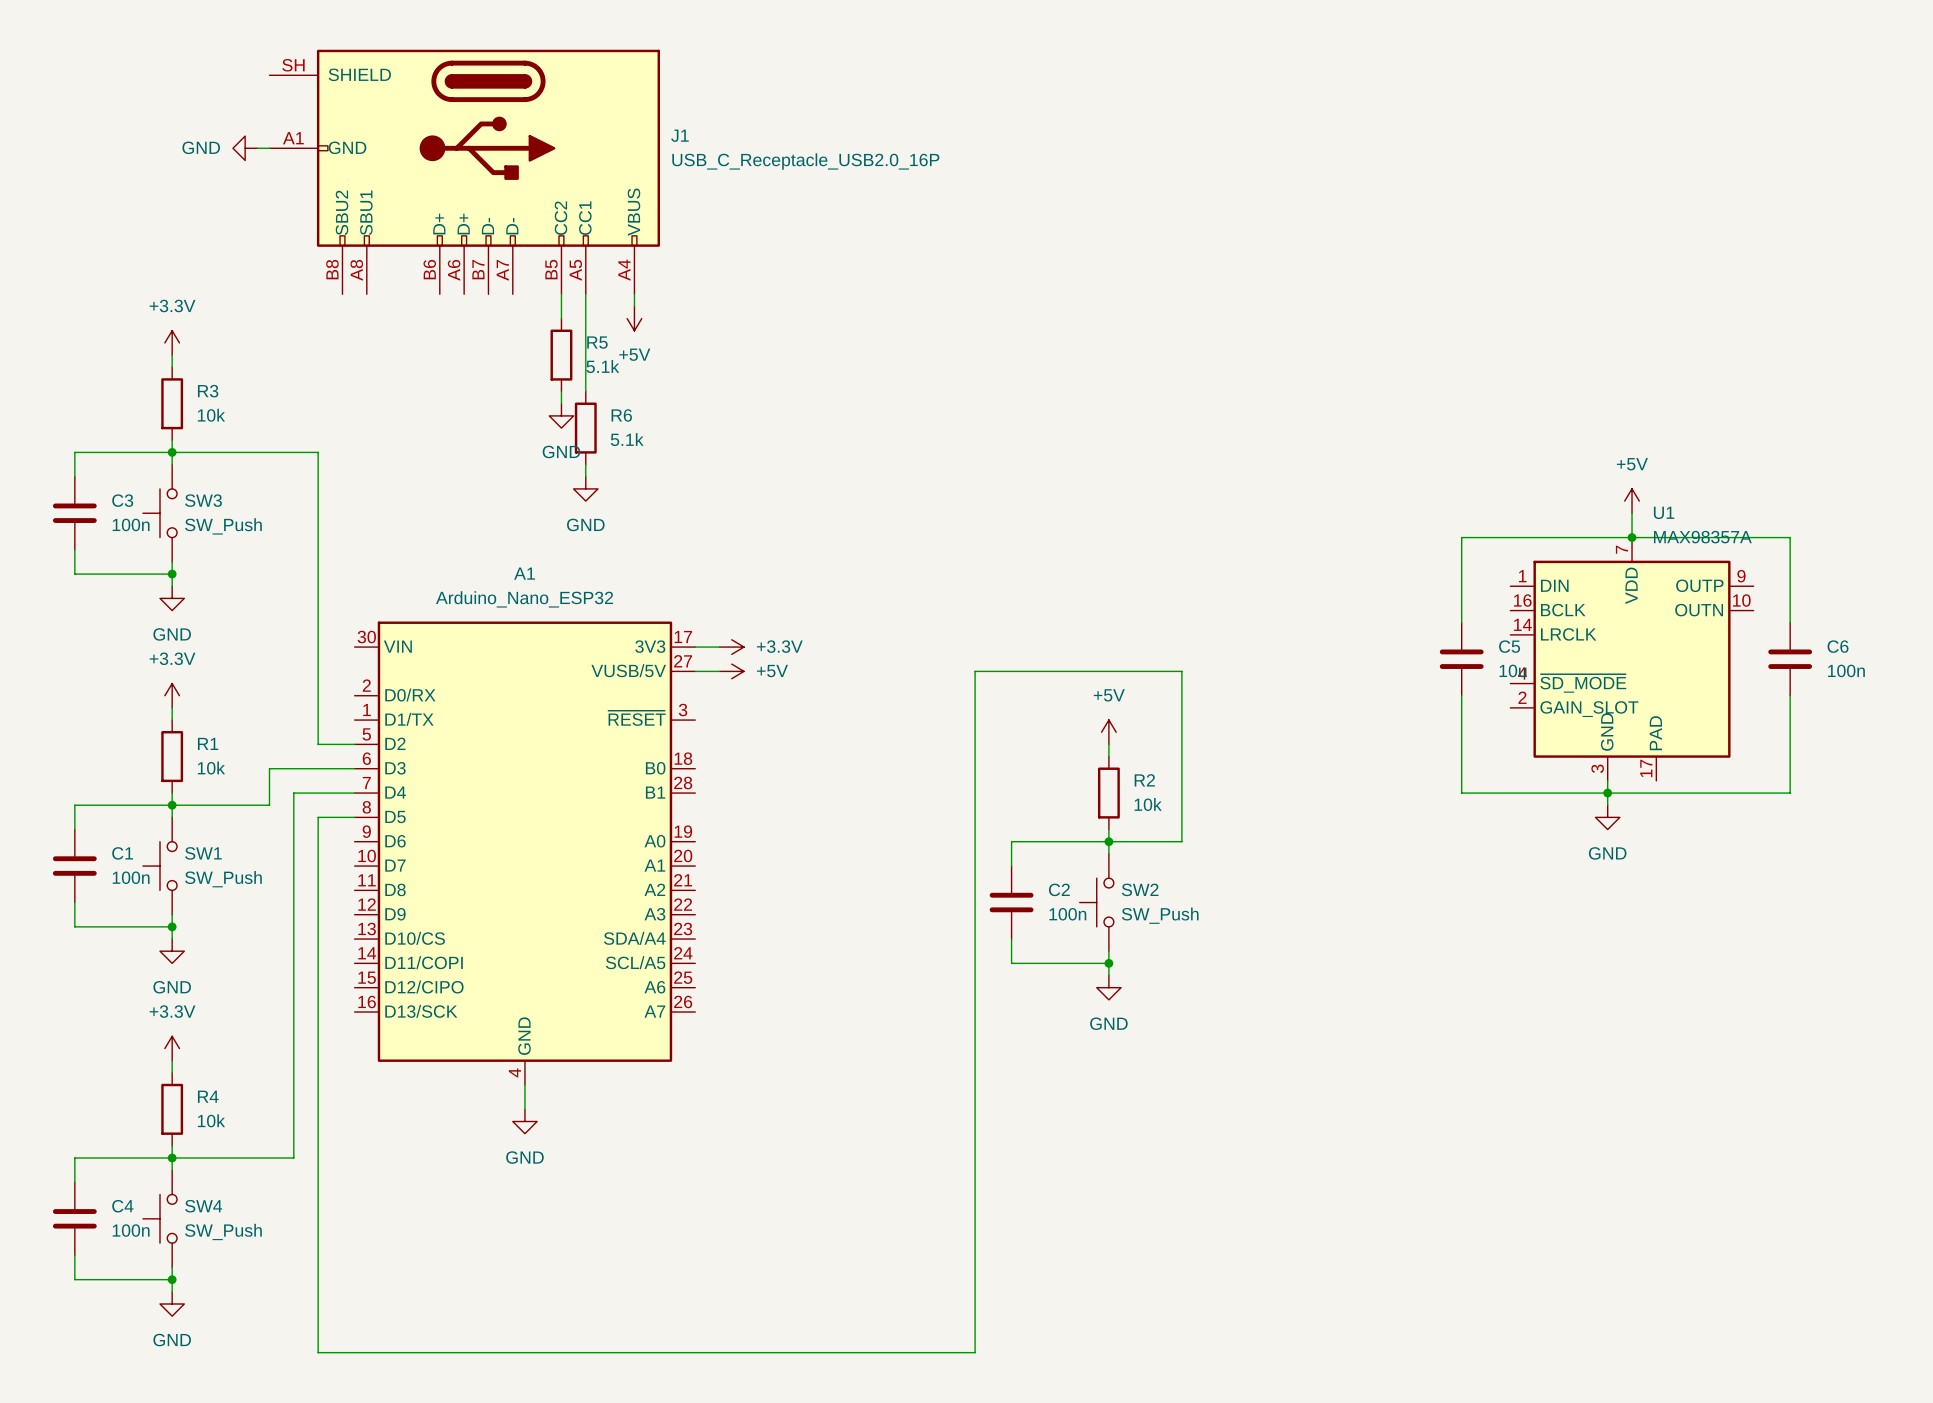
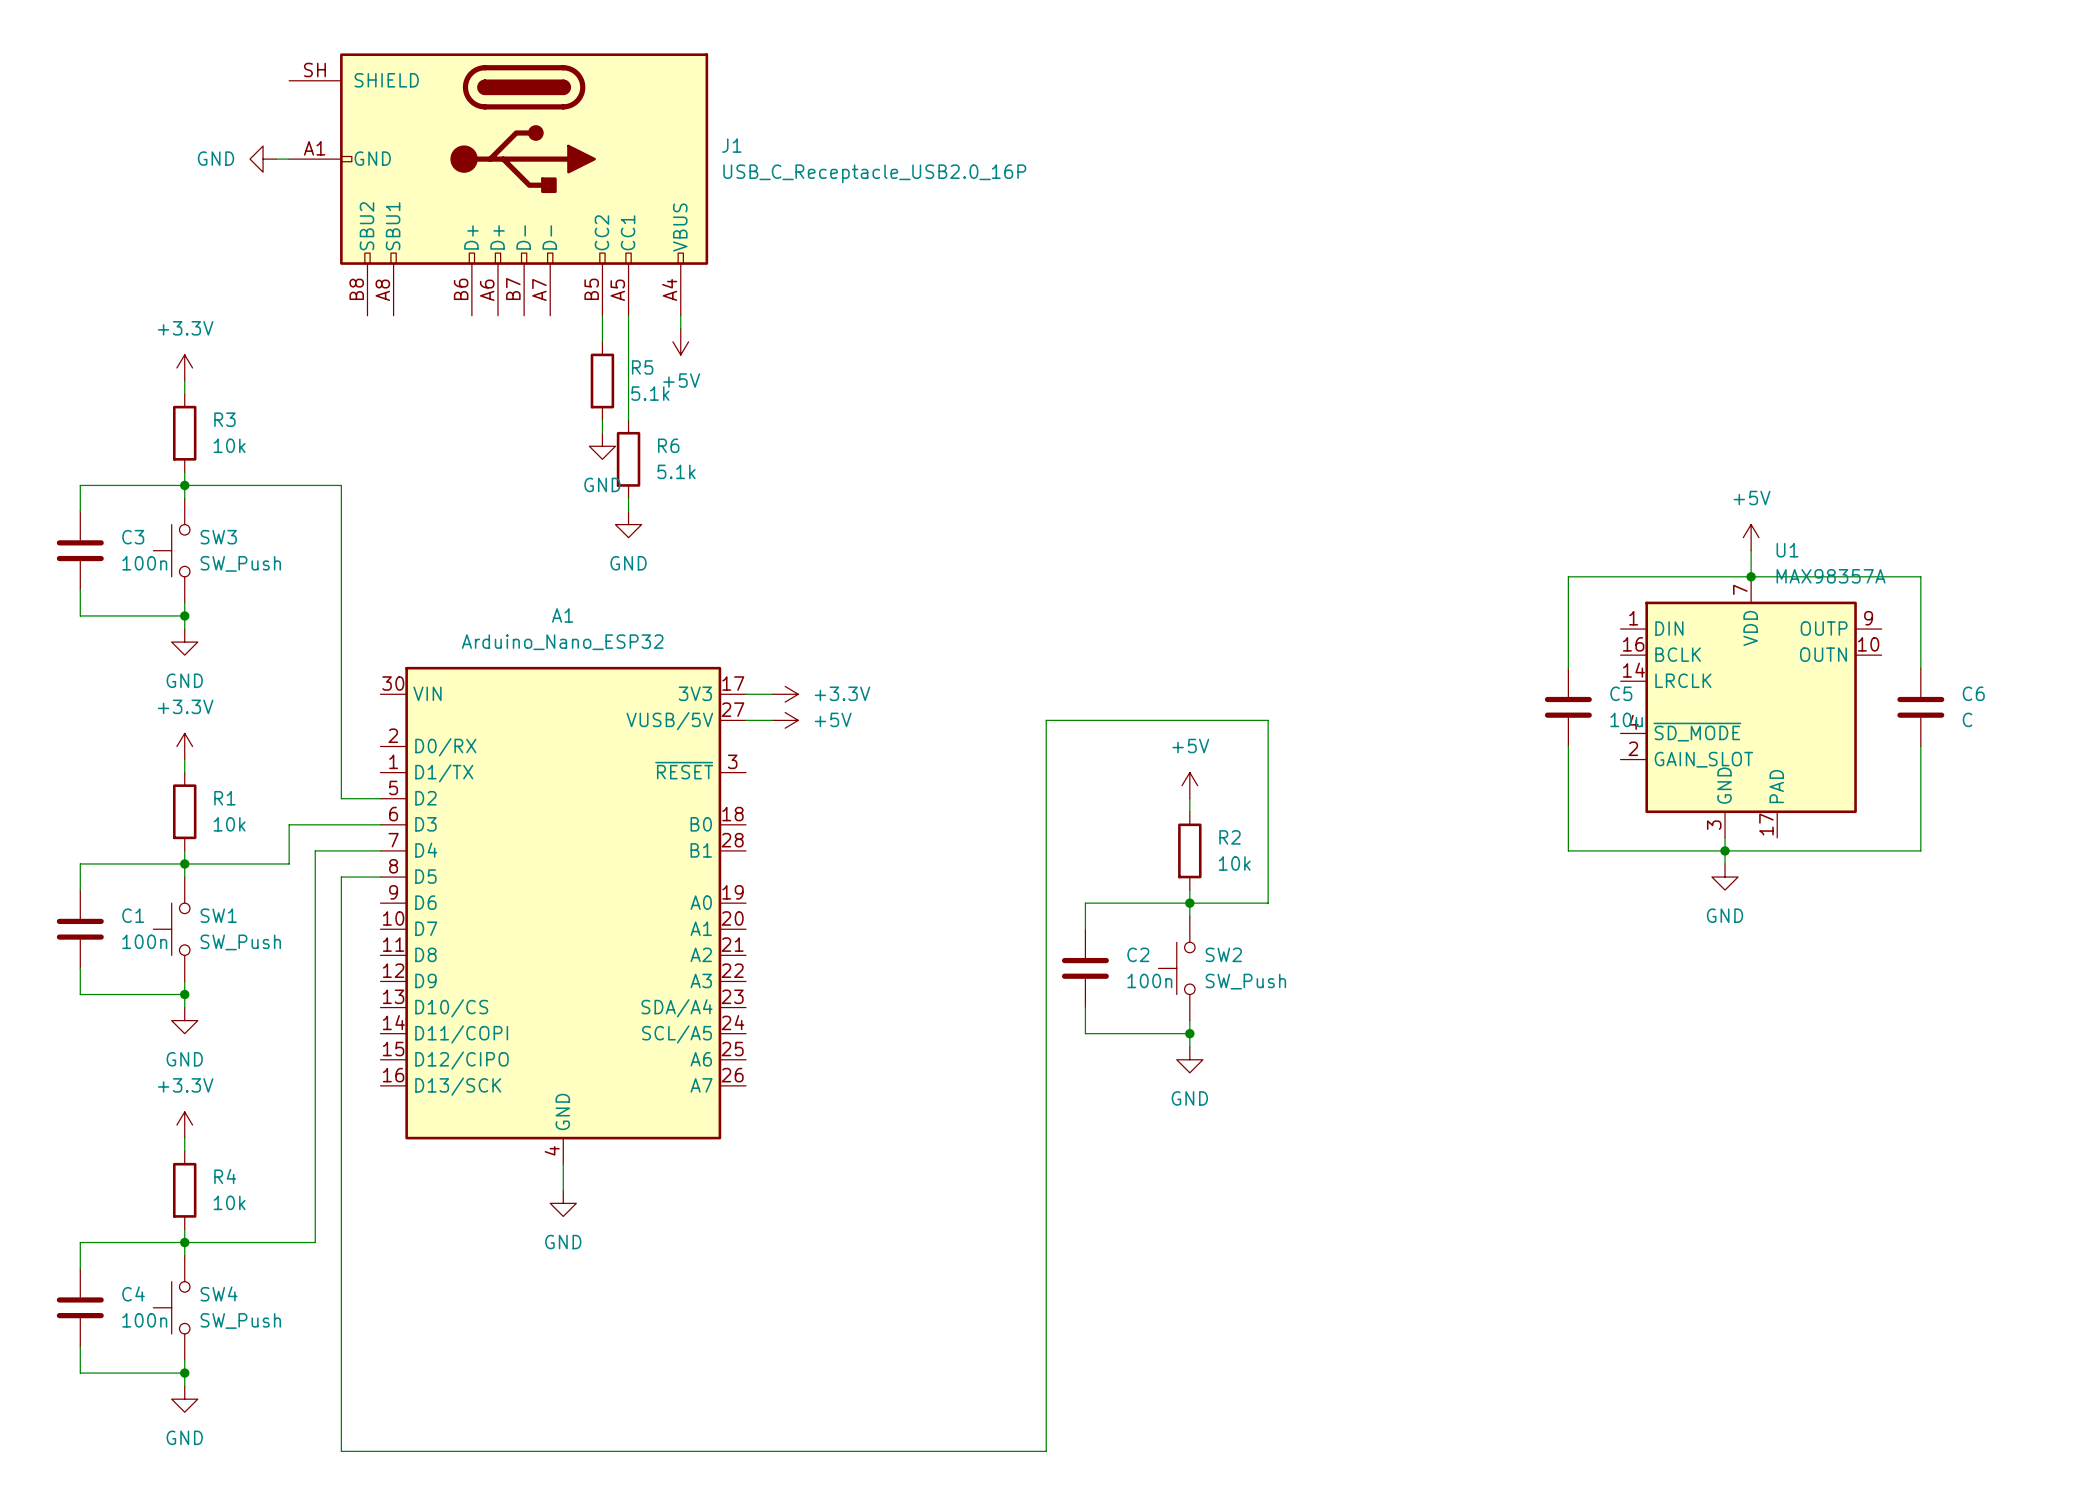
C6 value: 100n (1846, 670) -> C (1967, 719)

